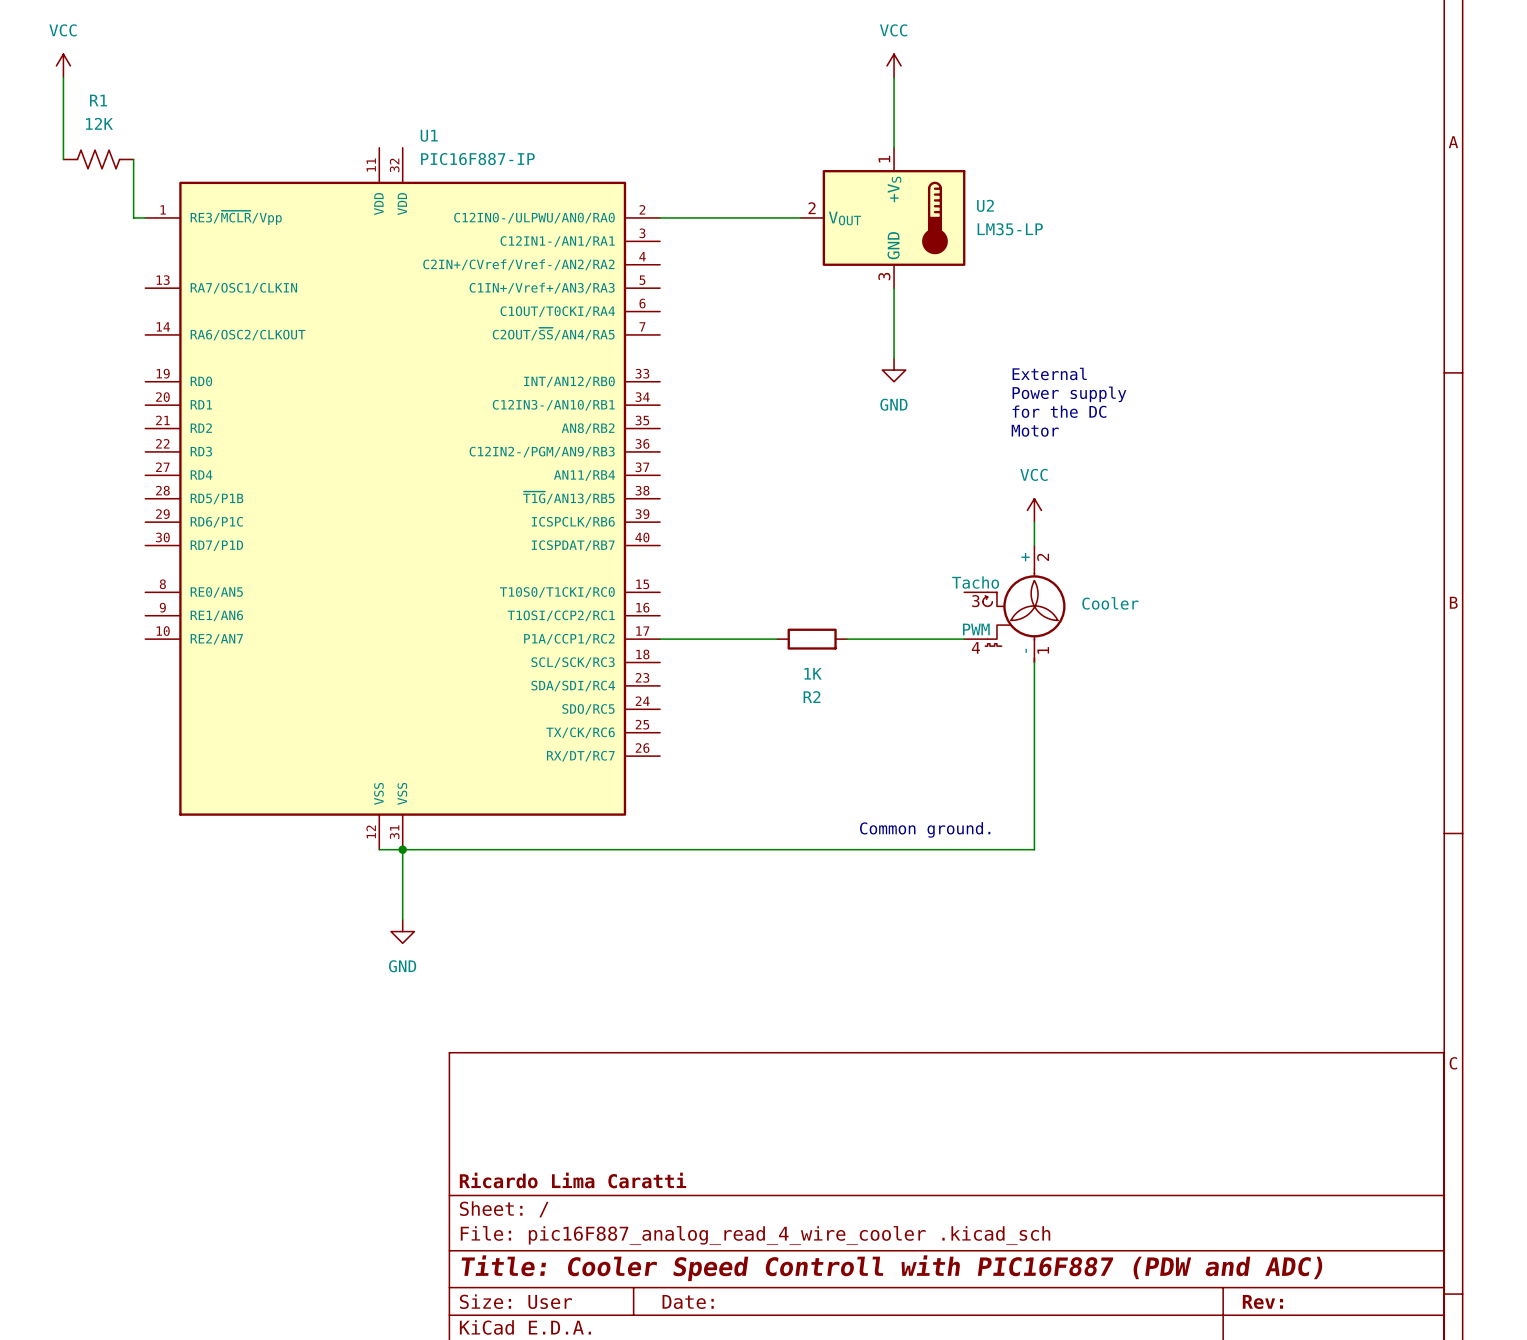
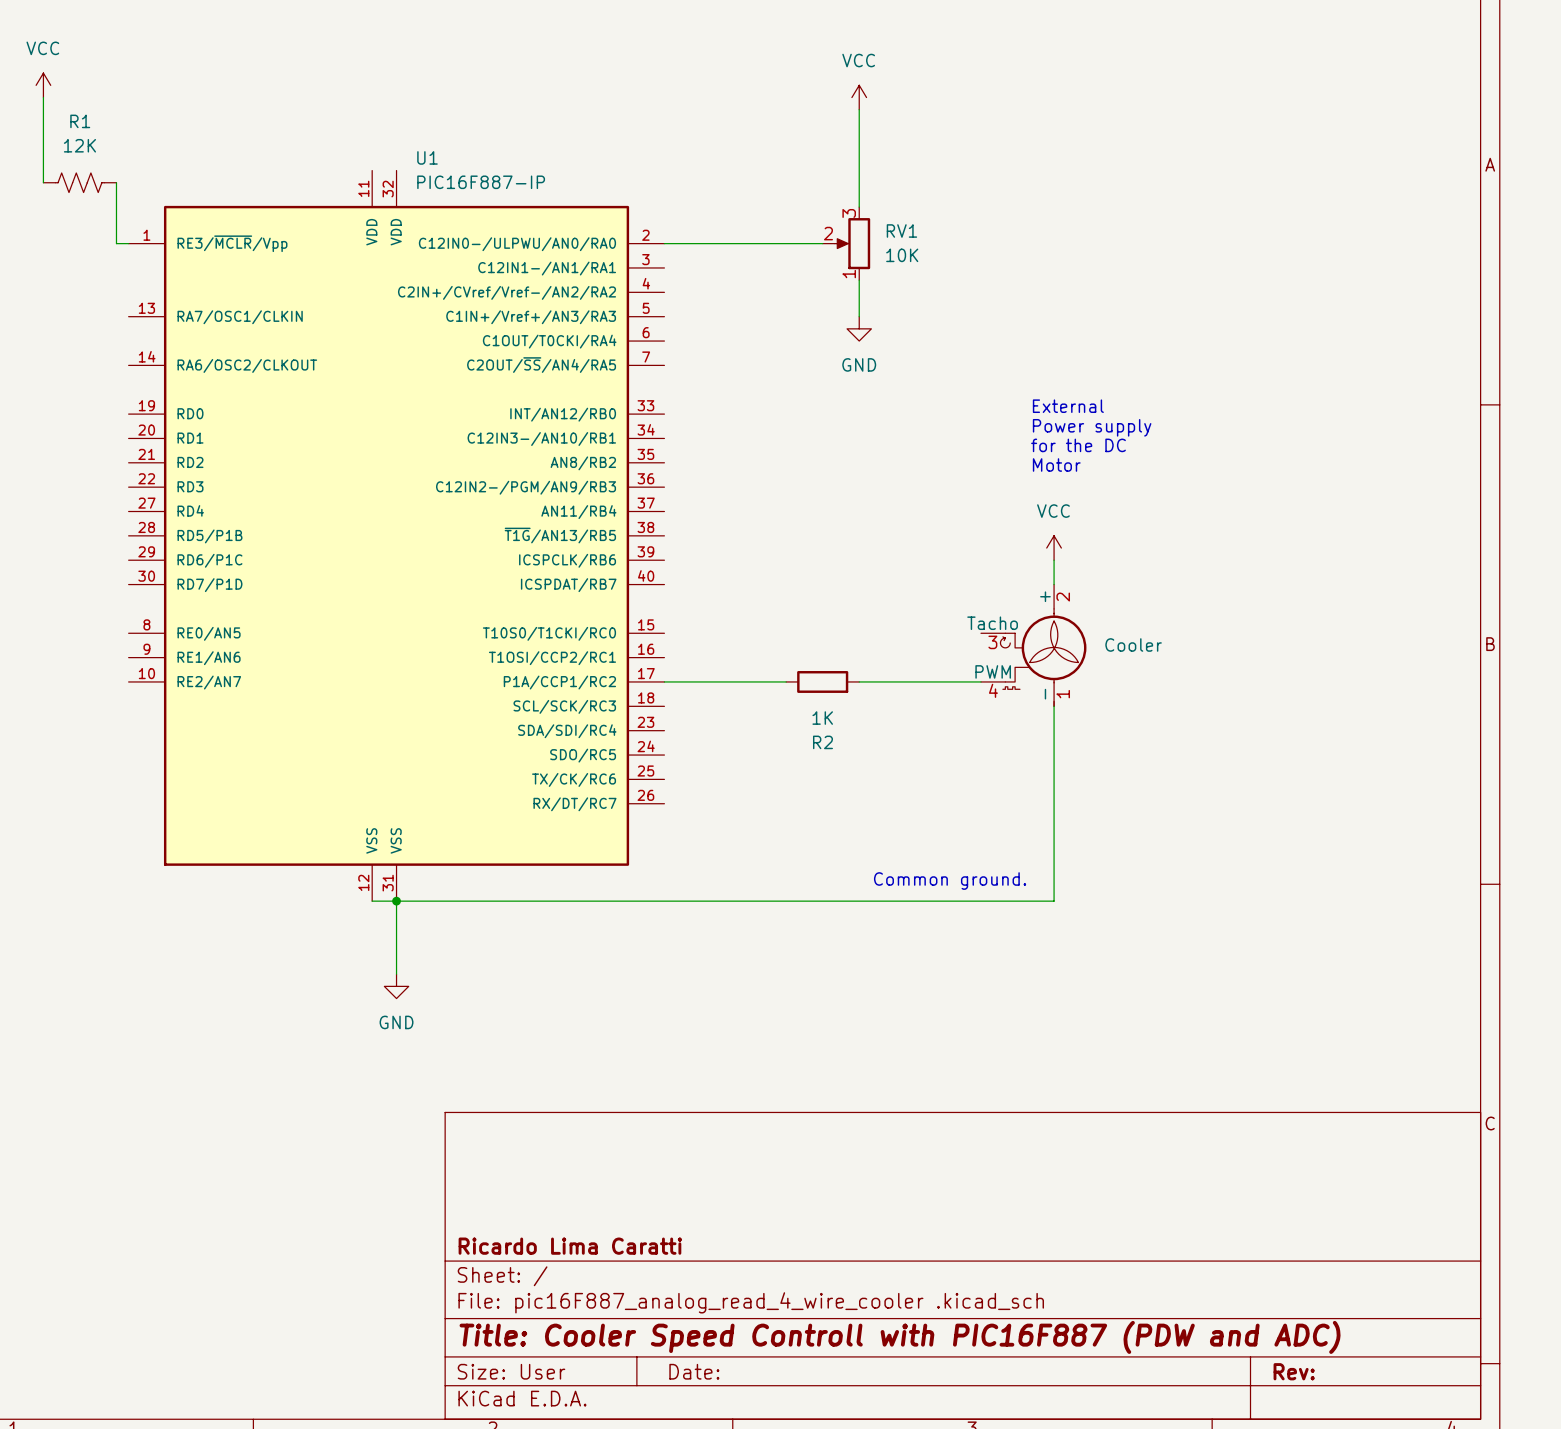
power symbol position: VCC (894, 65) -> VCC (859, 97)
wire: (894, 77) (894, 147) -> none
wire: none -> (859, 109) (859, 207)
RV1: none -> 10K (846, 243)
U2: LM35-LP (882, 217) -> none
wire: none -> (859, 280) (859, 316)
wire: (894, 288) (894, 358) -> none
power symbol position: GND (894, 370) -> GND (859, 328)

